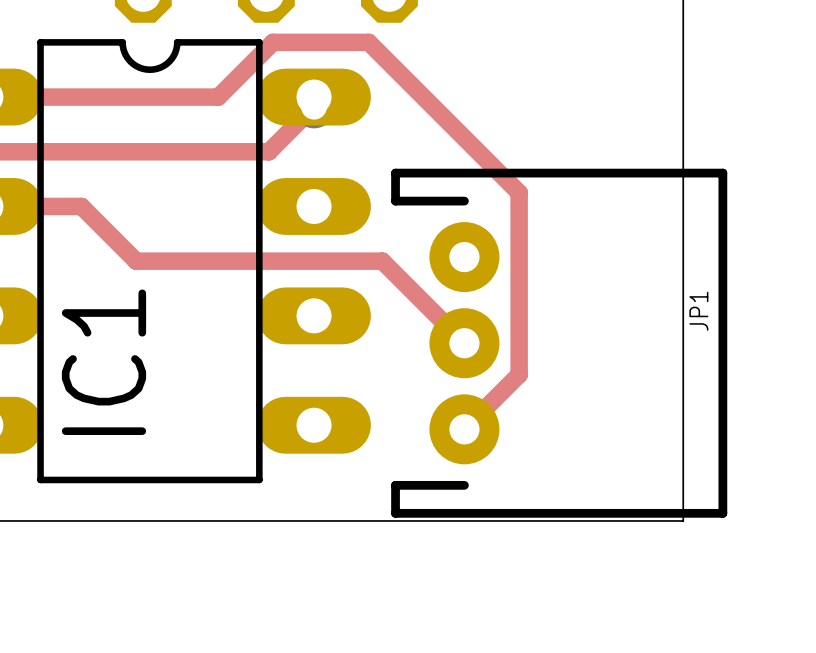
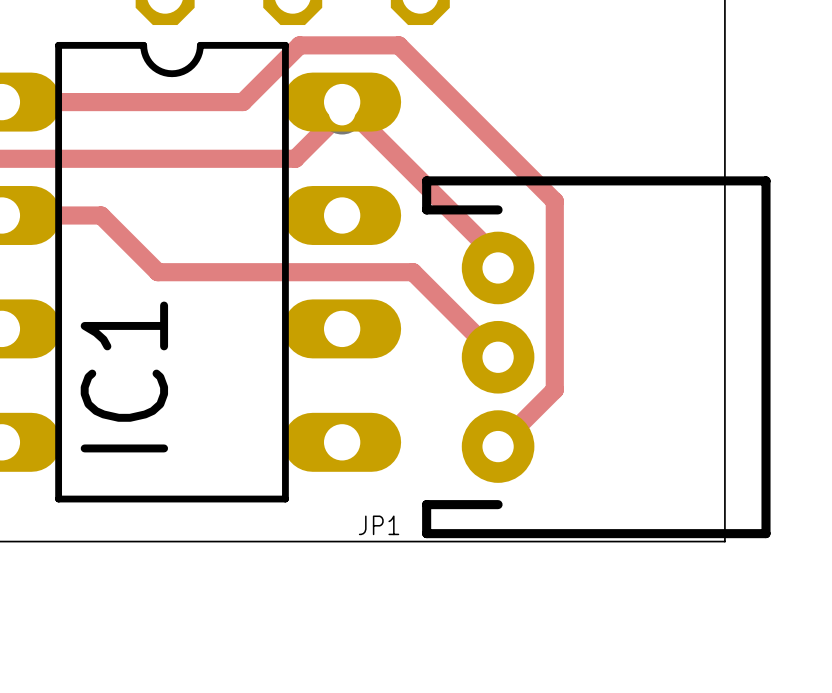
track: none -> (342, 102) (498, 258) (498, 272)
JP1 name rotation: 0° (698, 311) -> 90° clockwise (379, 525)
JP1 name position: JP1 (698, 311) -> JP1 (379, 525)

